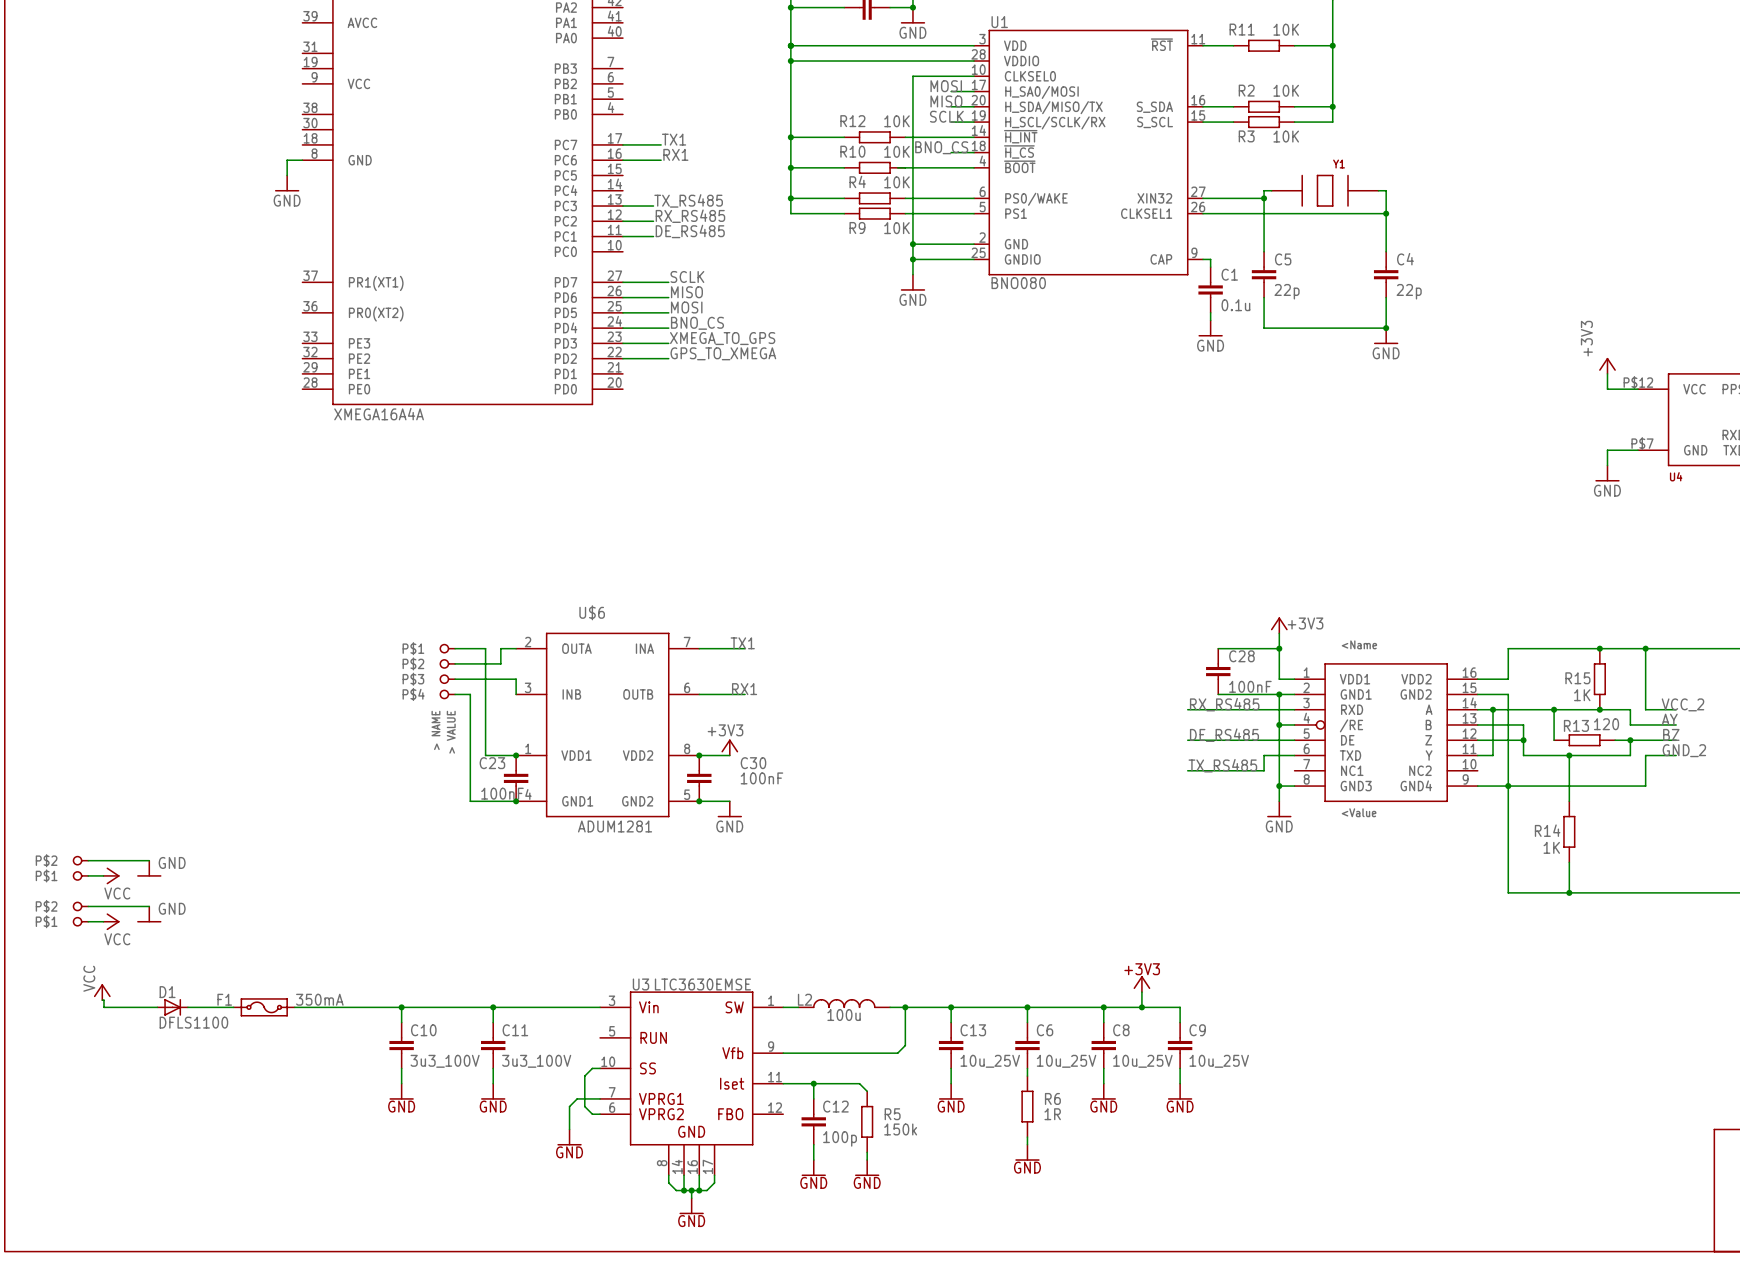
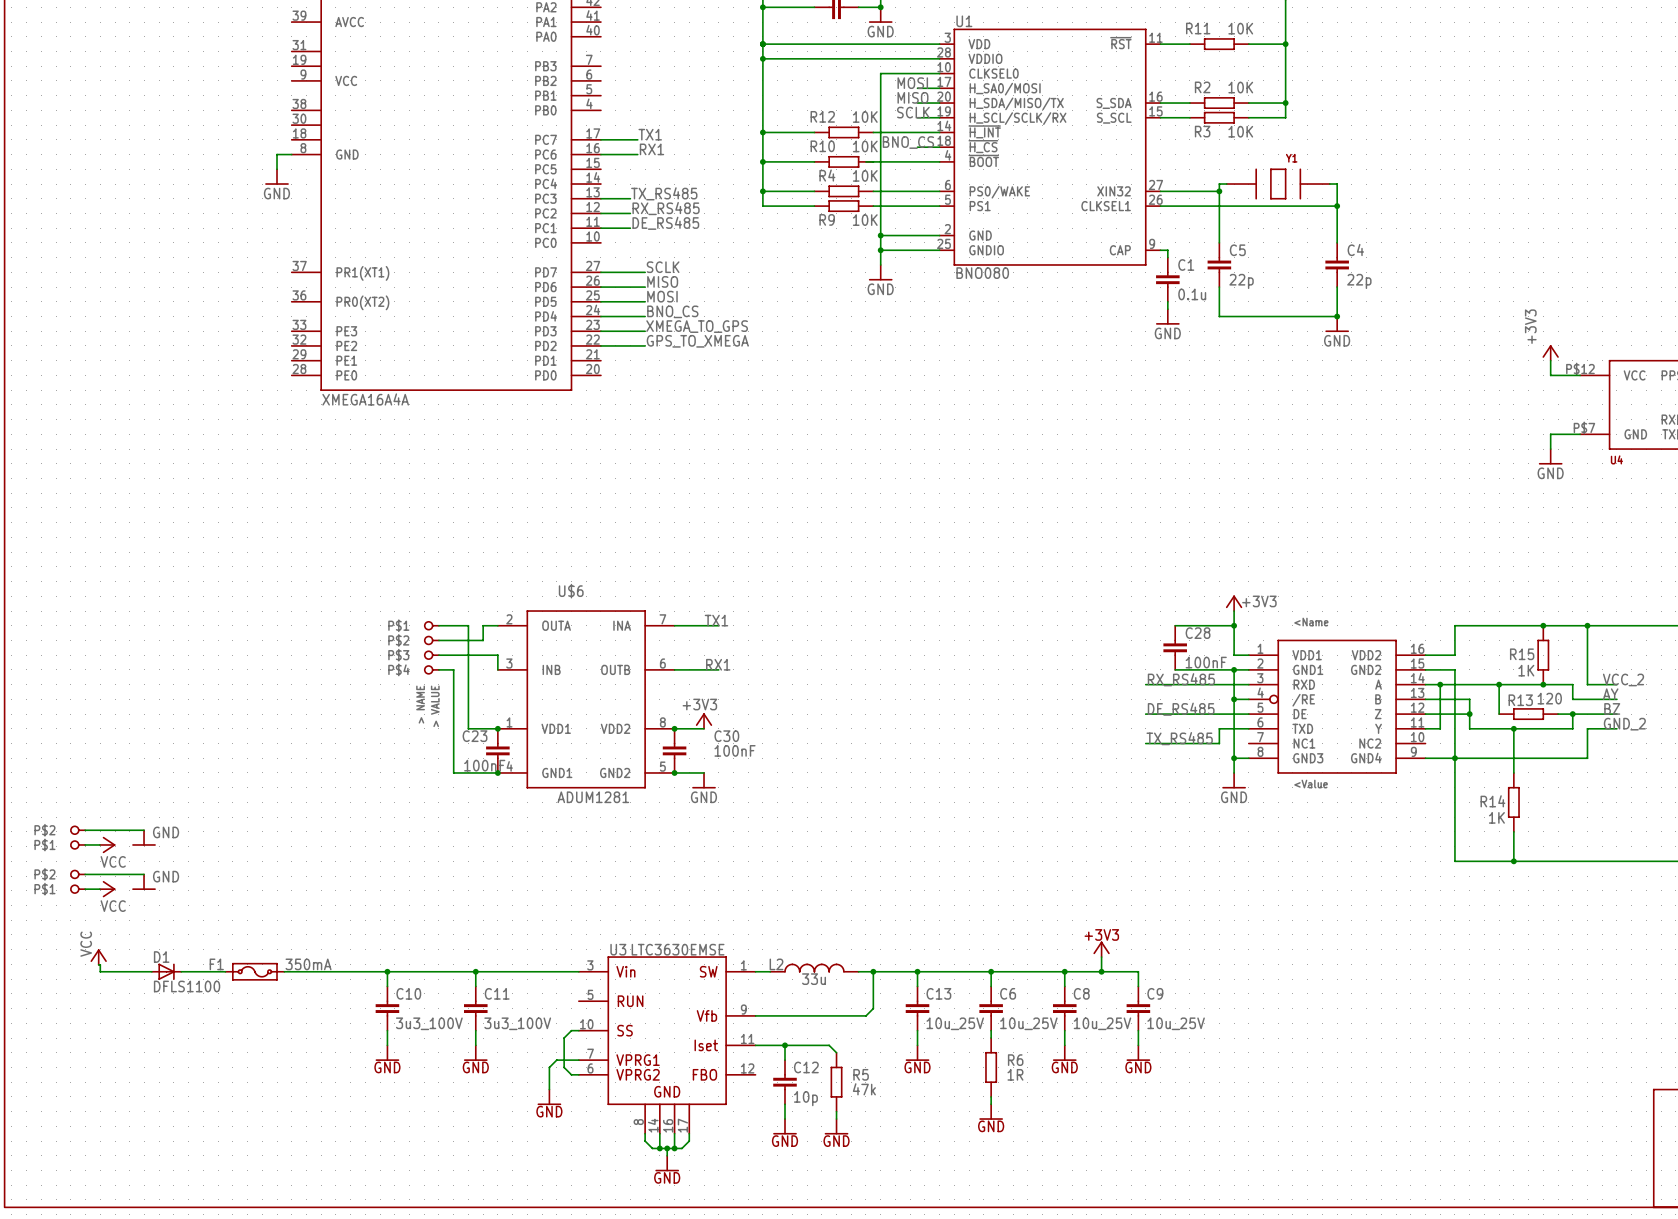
L2 value: 100u (844, 1015) -> 33u (814, 979)
R5 value: 150k (900, 1129) -> 47k (864, 1089)
C12 value: 100p (840, 1138) -> 10p (805, 1098)

